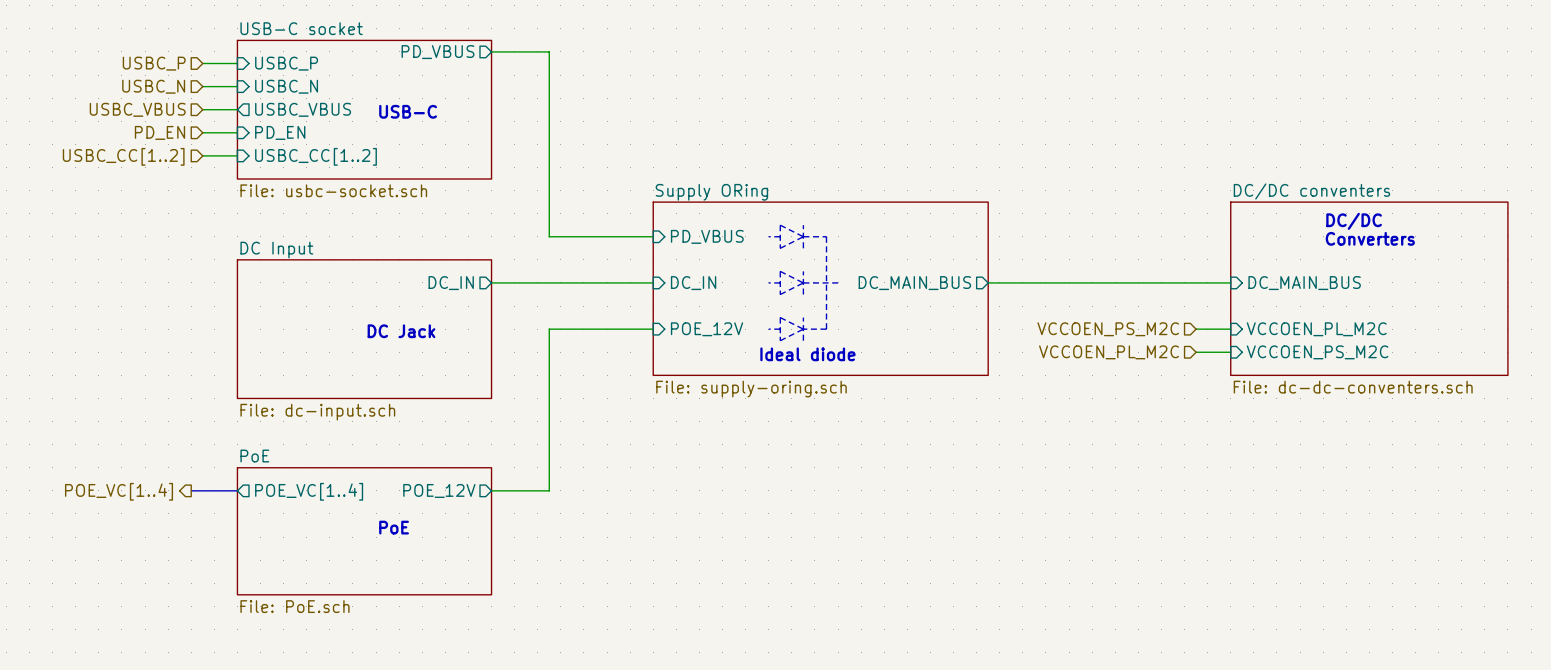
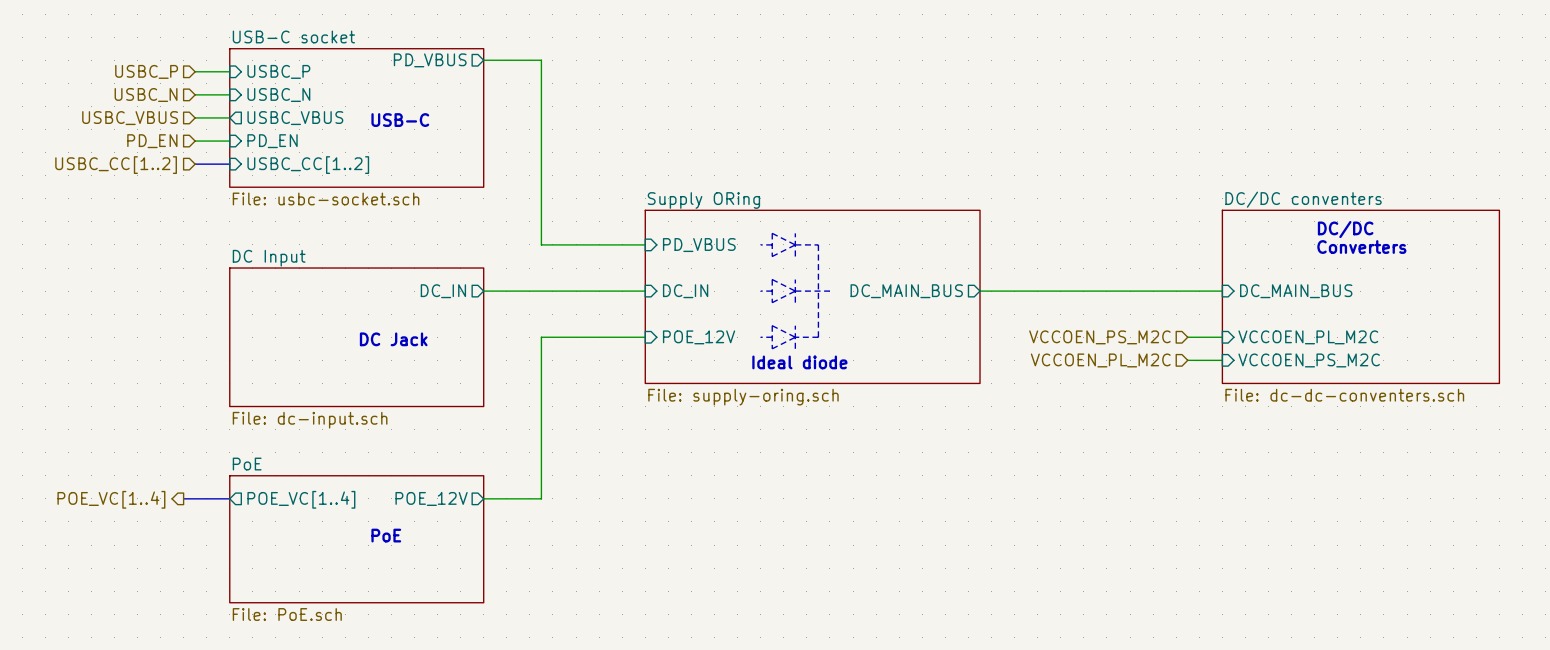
bus: none -> (195, 164) (229, 164)

